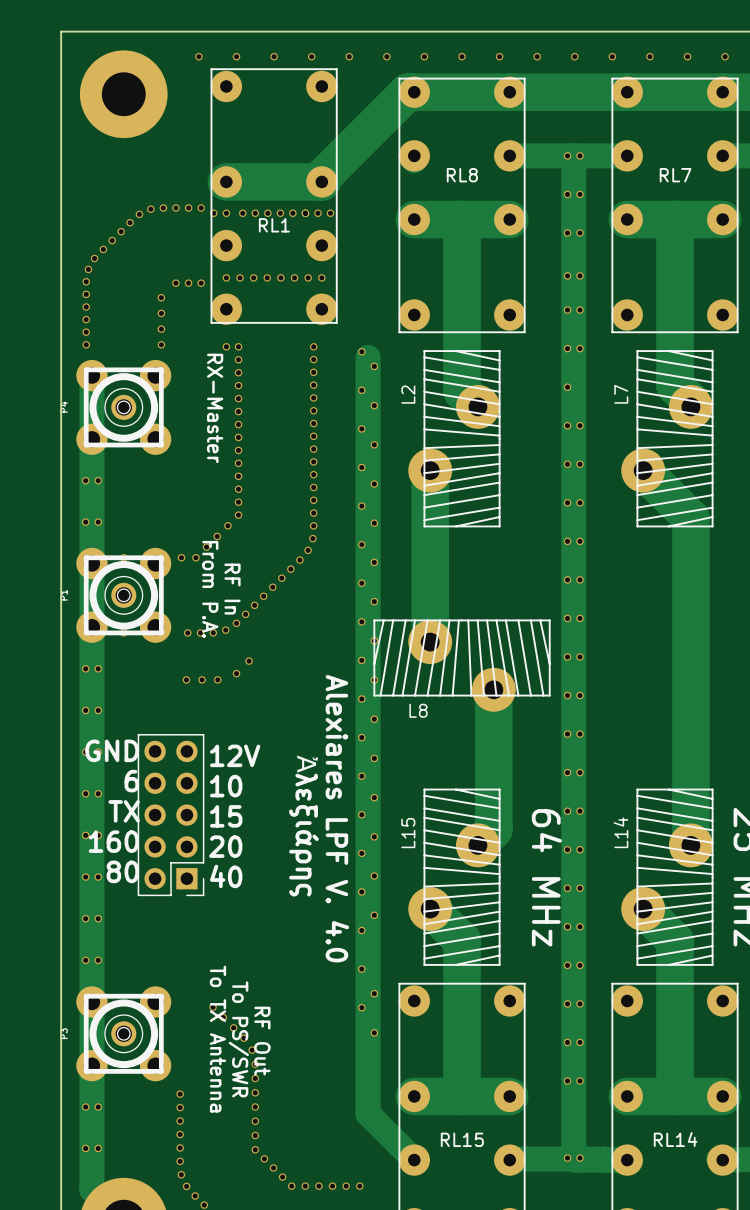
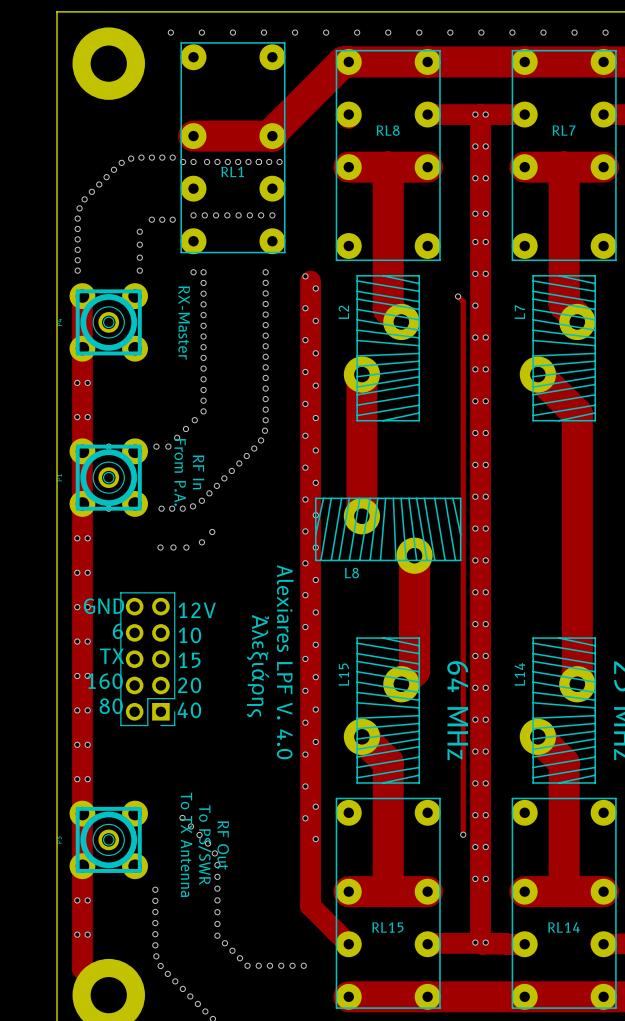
track: none -> (458, 296) (463, 301) (463, 834)
via: none -> (458, 296)
via: none -> (463, 834)

